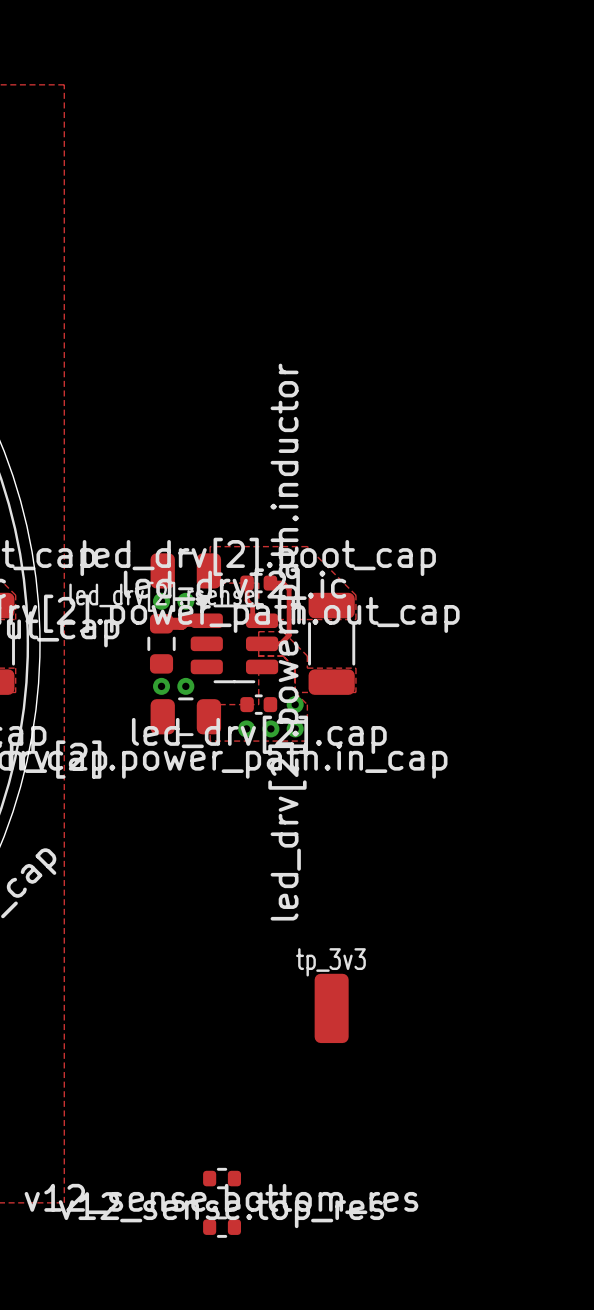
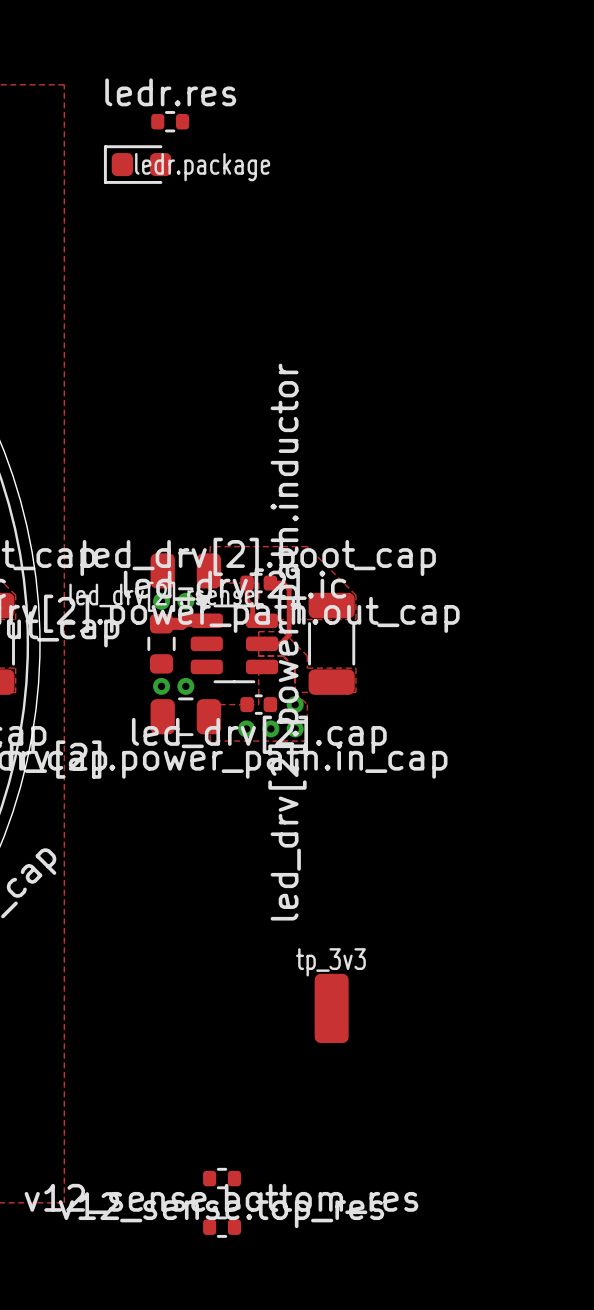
ledr.res: none -> (170, 121)
ledr.package: none -> (137, 164)

